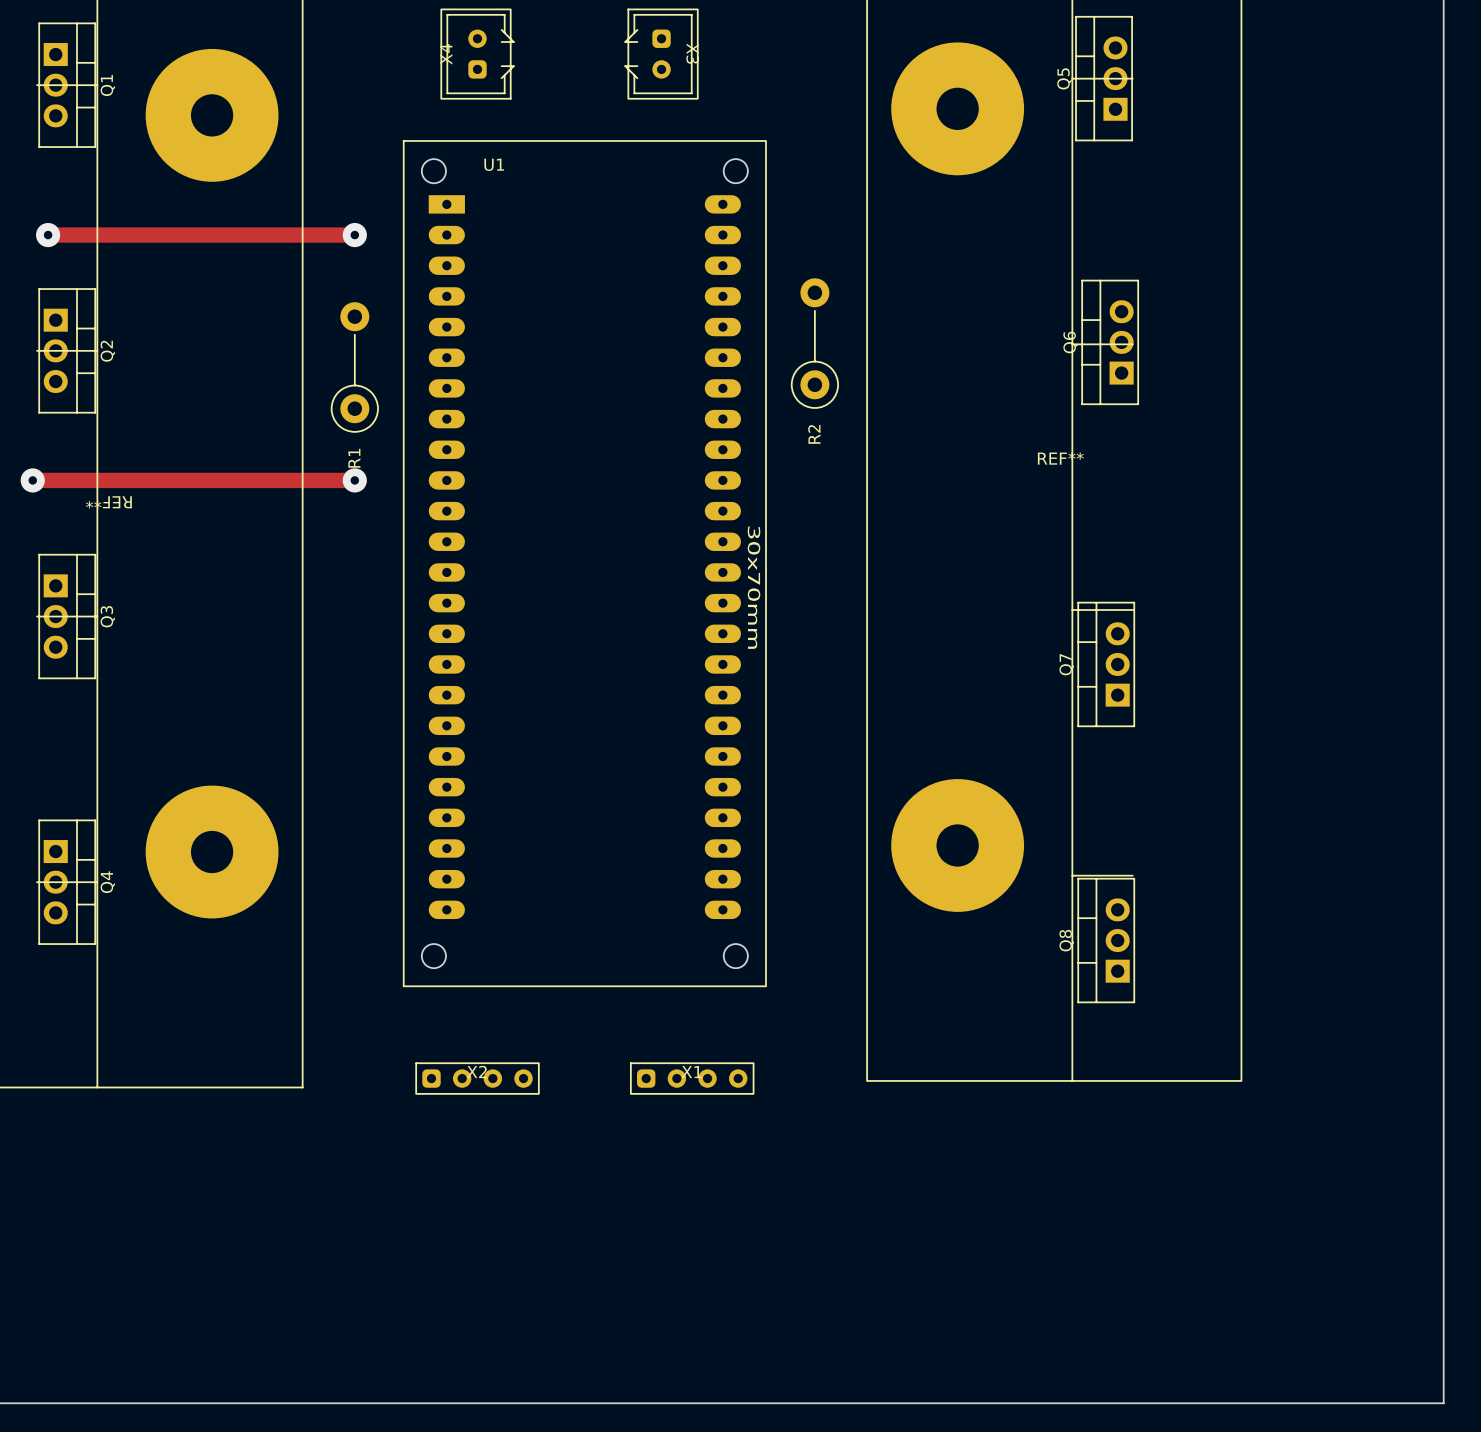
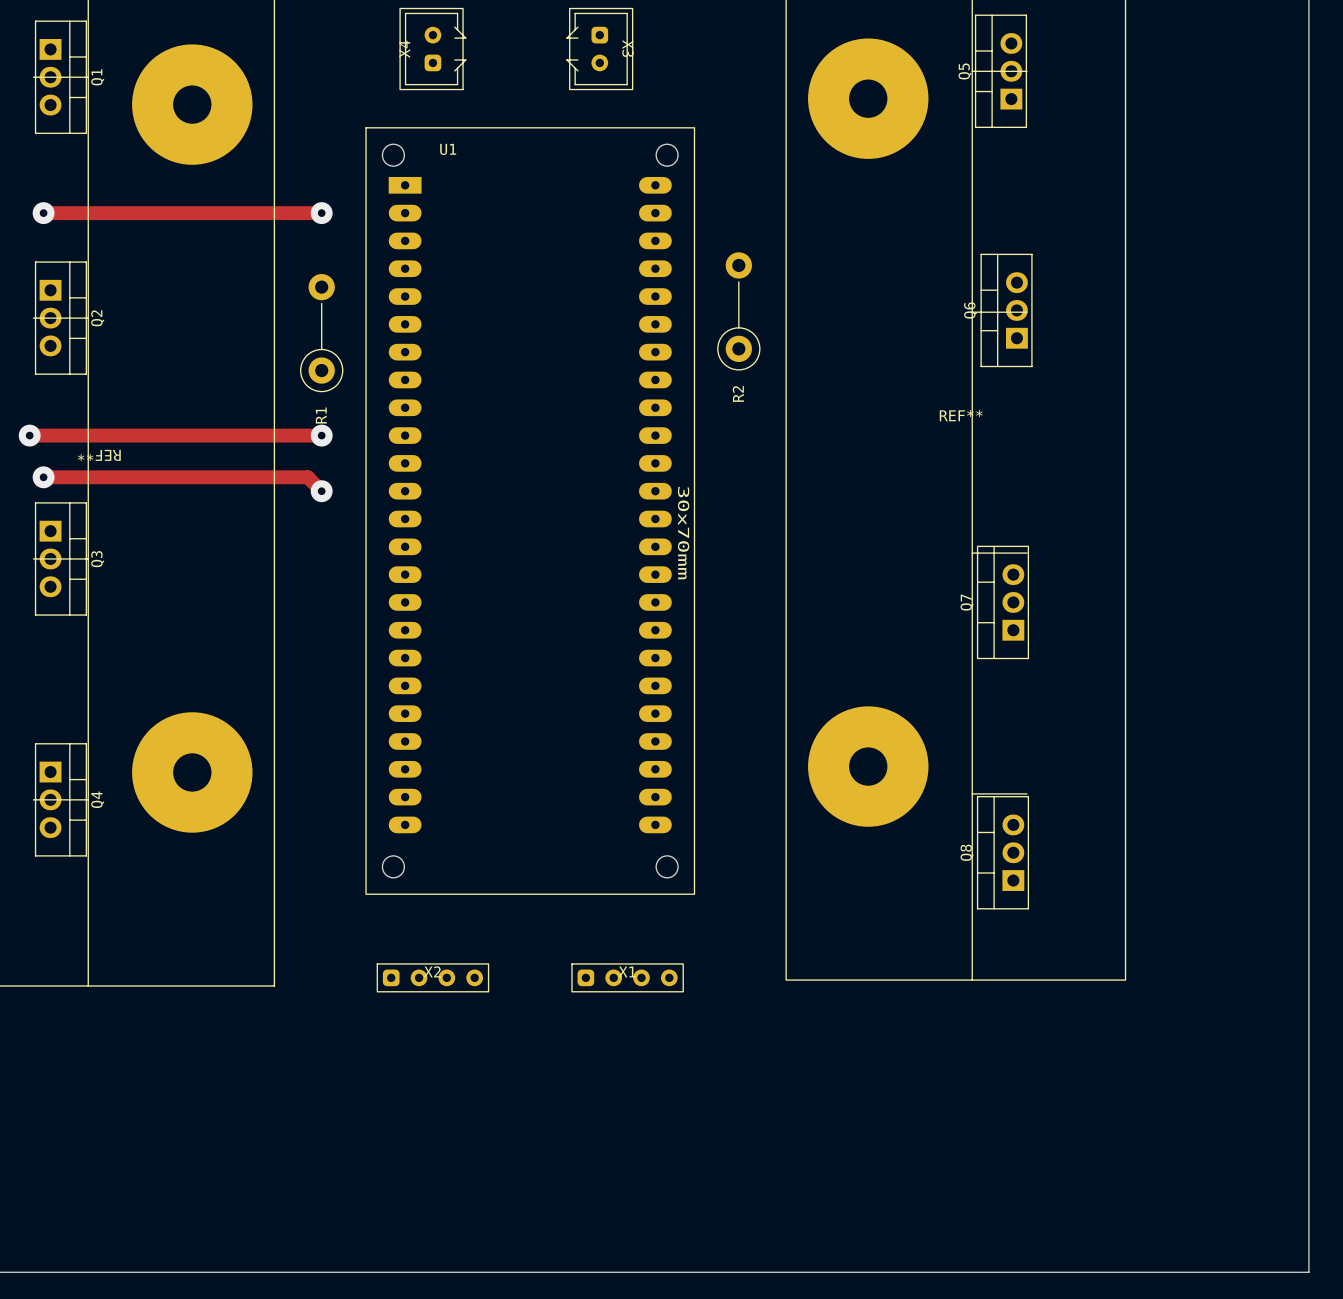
track: none -> (43, 477) (307, 477) (321, 491)
via: none -> (43, 477)
via: none -> (321, 491)

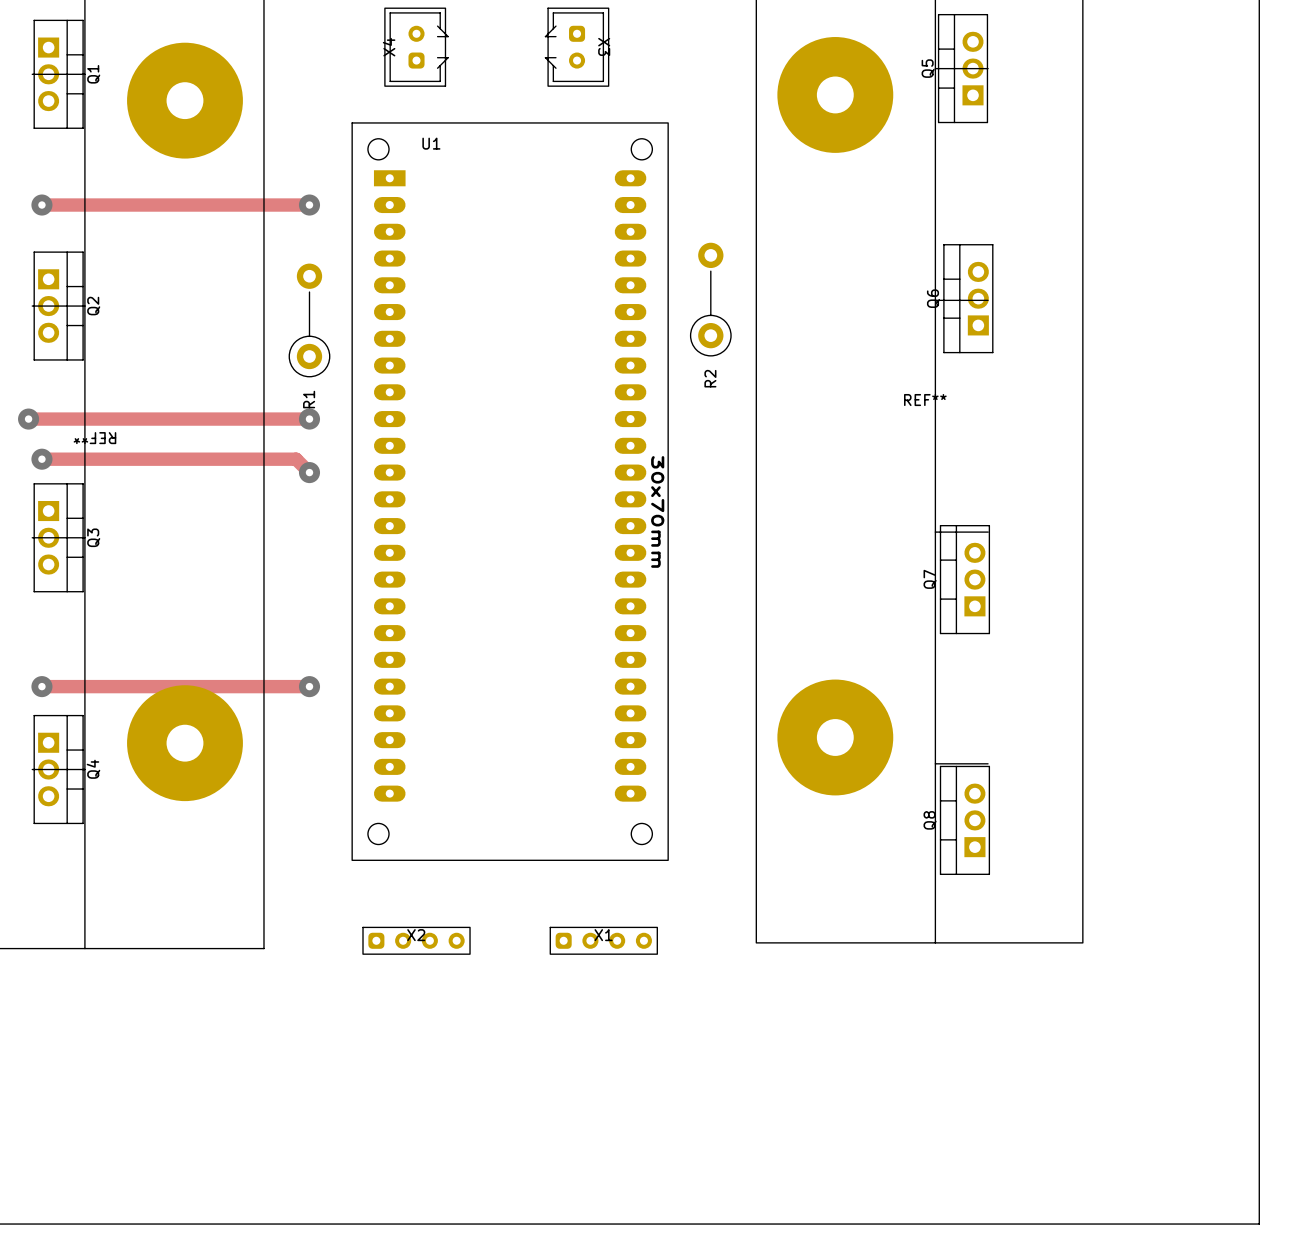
track: none -> (41, 686) (309, 686)
via: none -> (41, 686)
via: none -> (309, 686)

